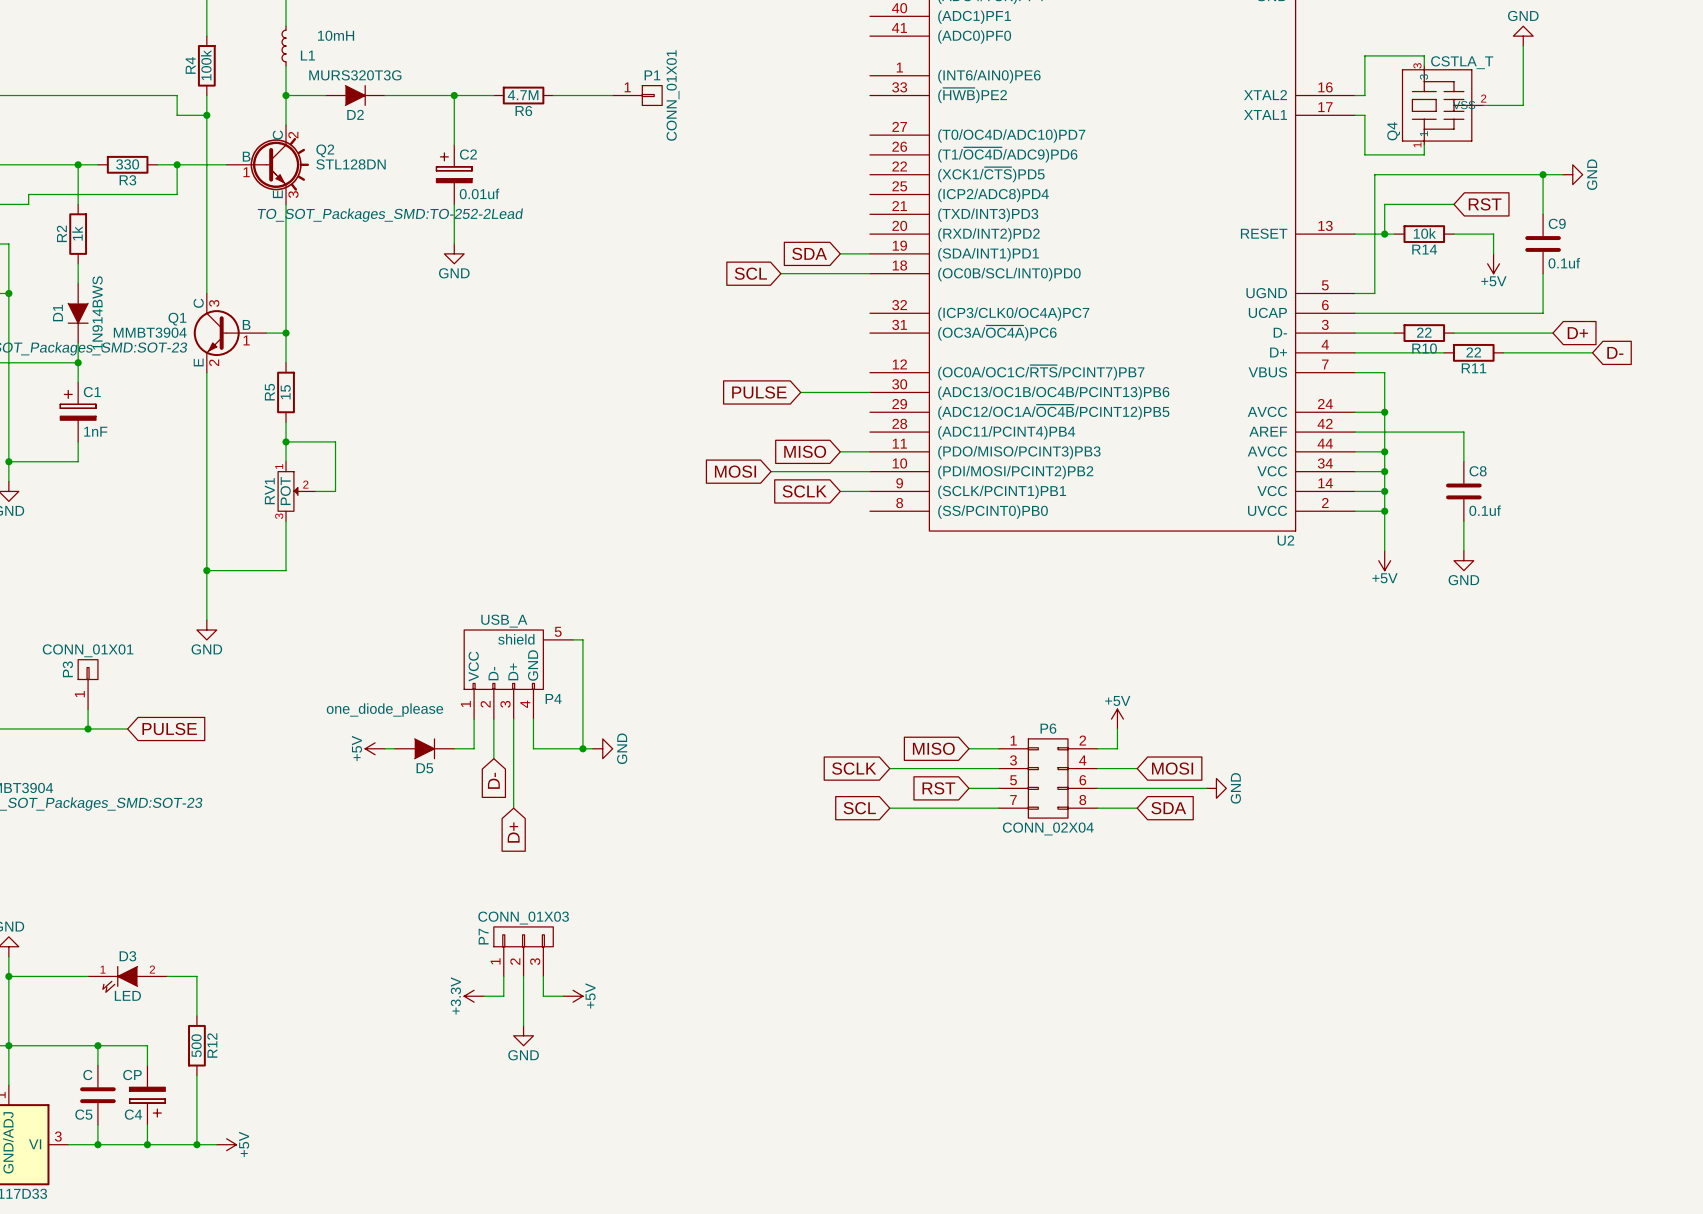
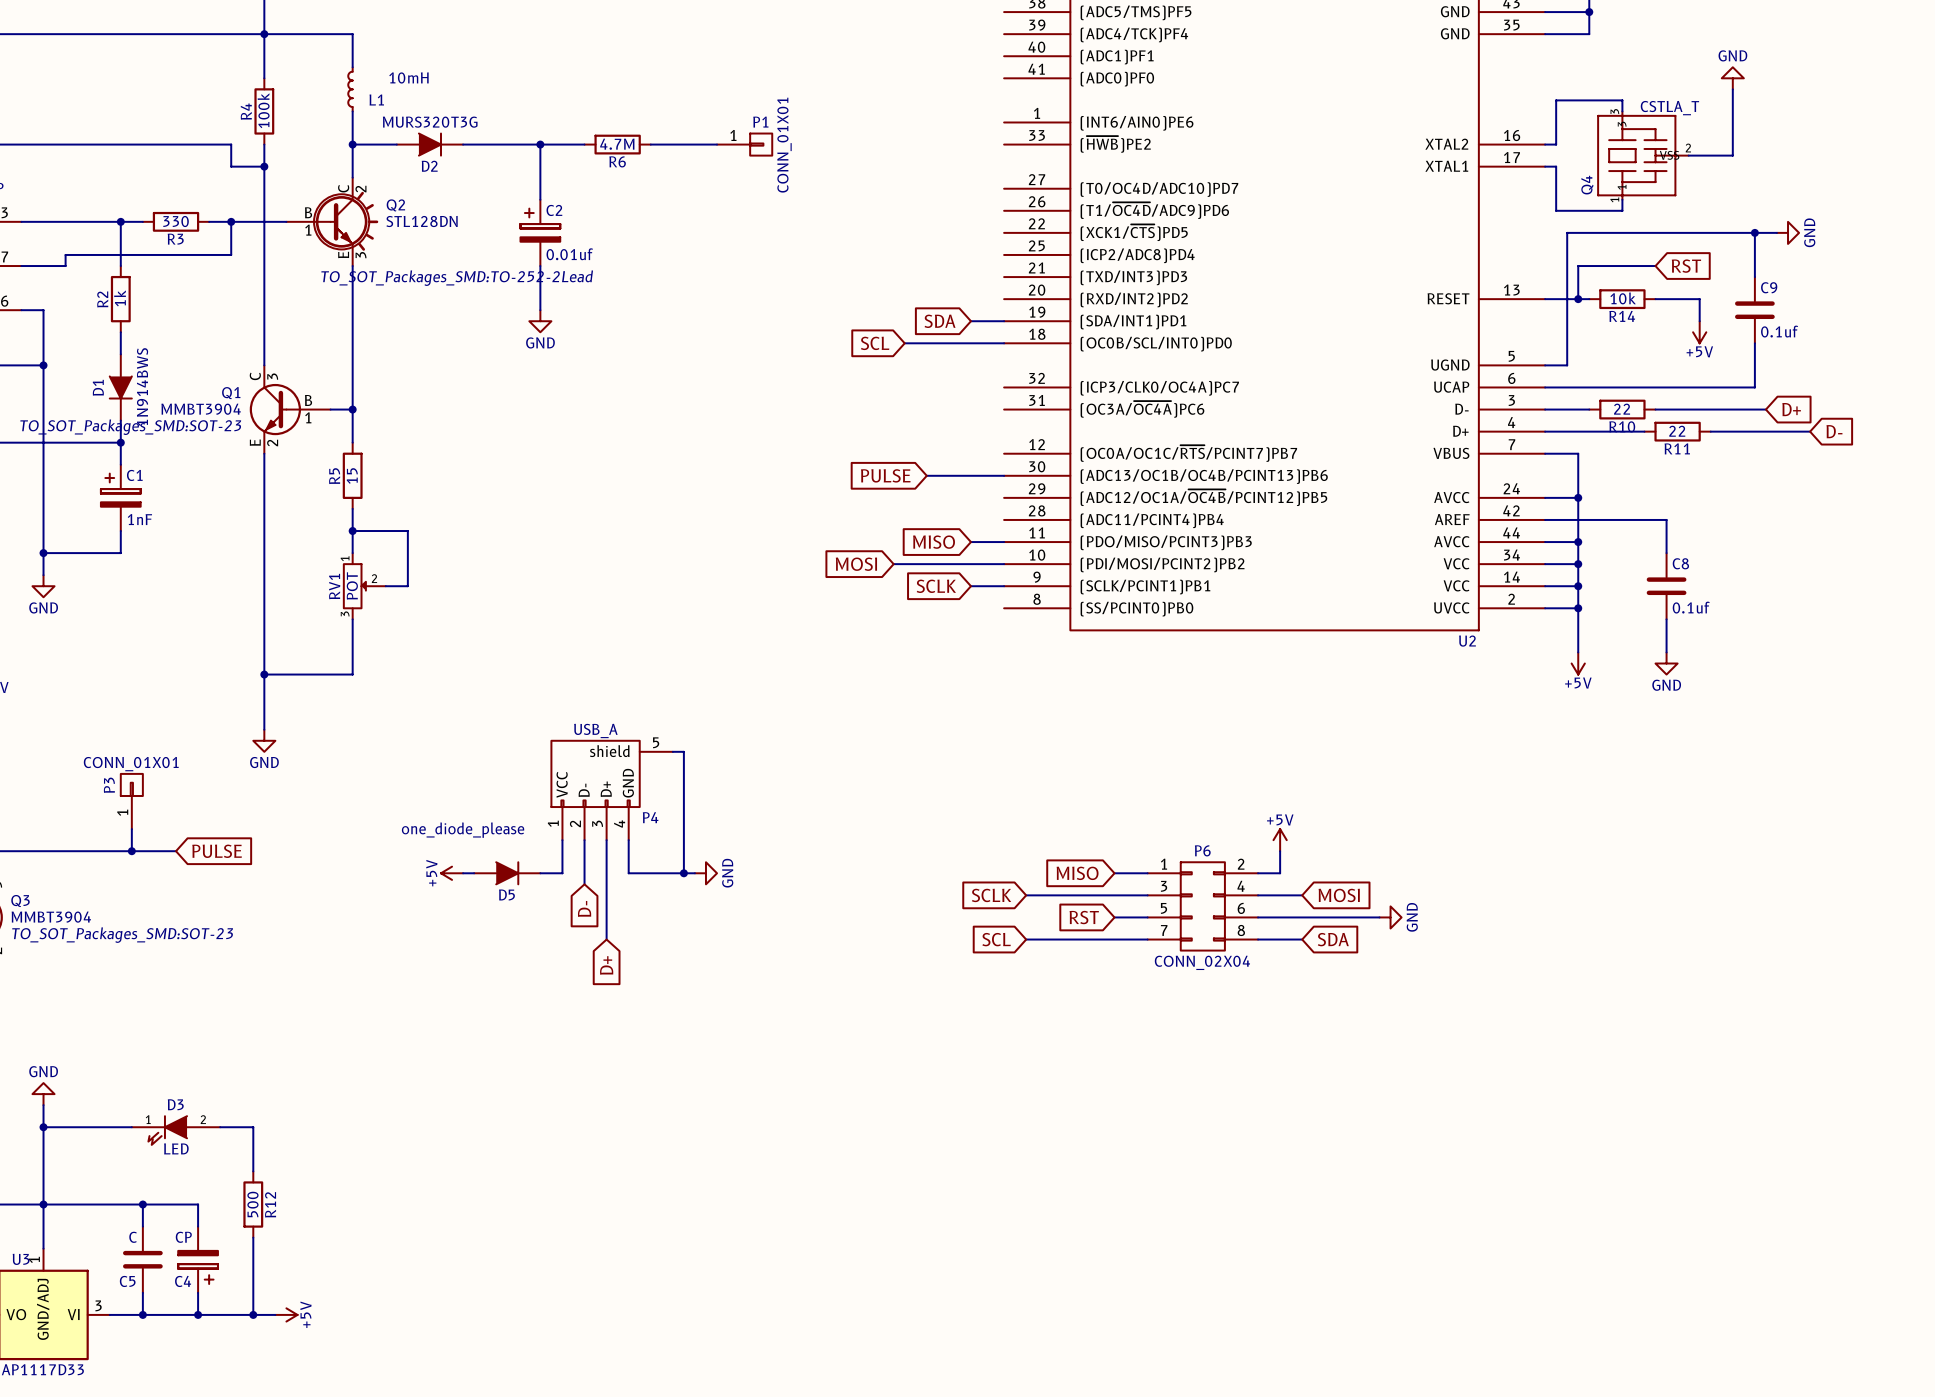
P7: CONN_01X03 (523, 951) -> none
wire: (503, 976) (503, 996) (483, 996) -> none
wire: (523, 976) (523, 1025) -> none
wire: (543, 976) (543, 996) (563, 996) -> none
power symbol: +3.3V (474, 996) -> none
power symbol: +5V (573, 996) -> none
power symbol: GND (523, 1035) -> none

